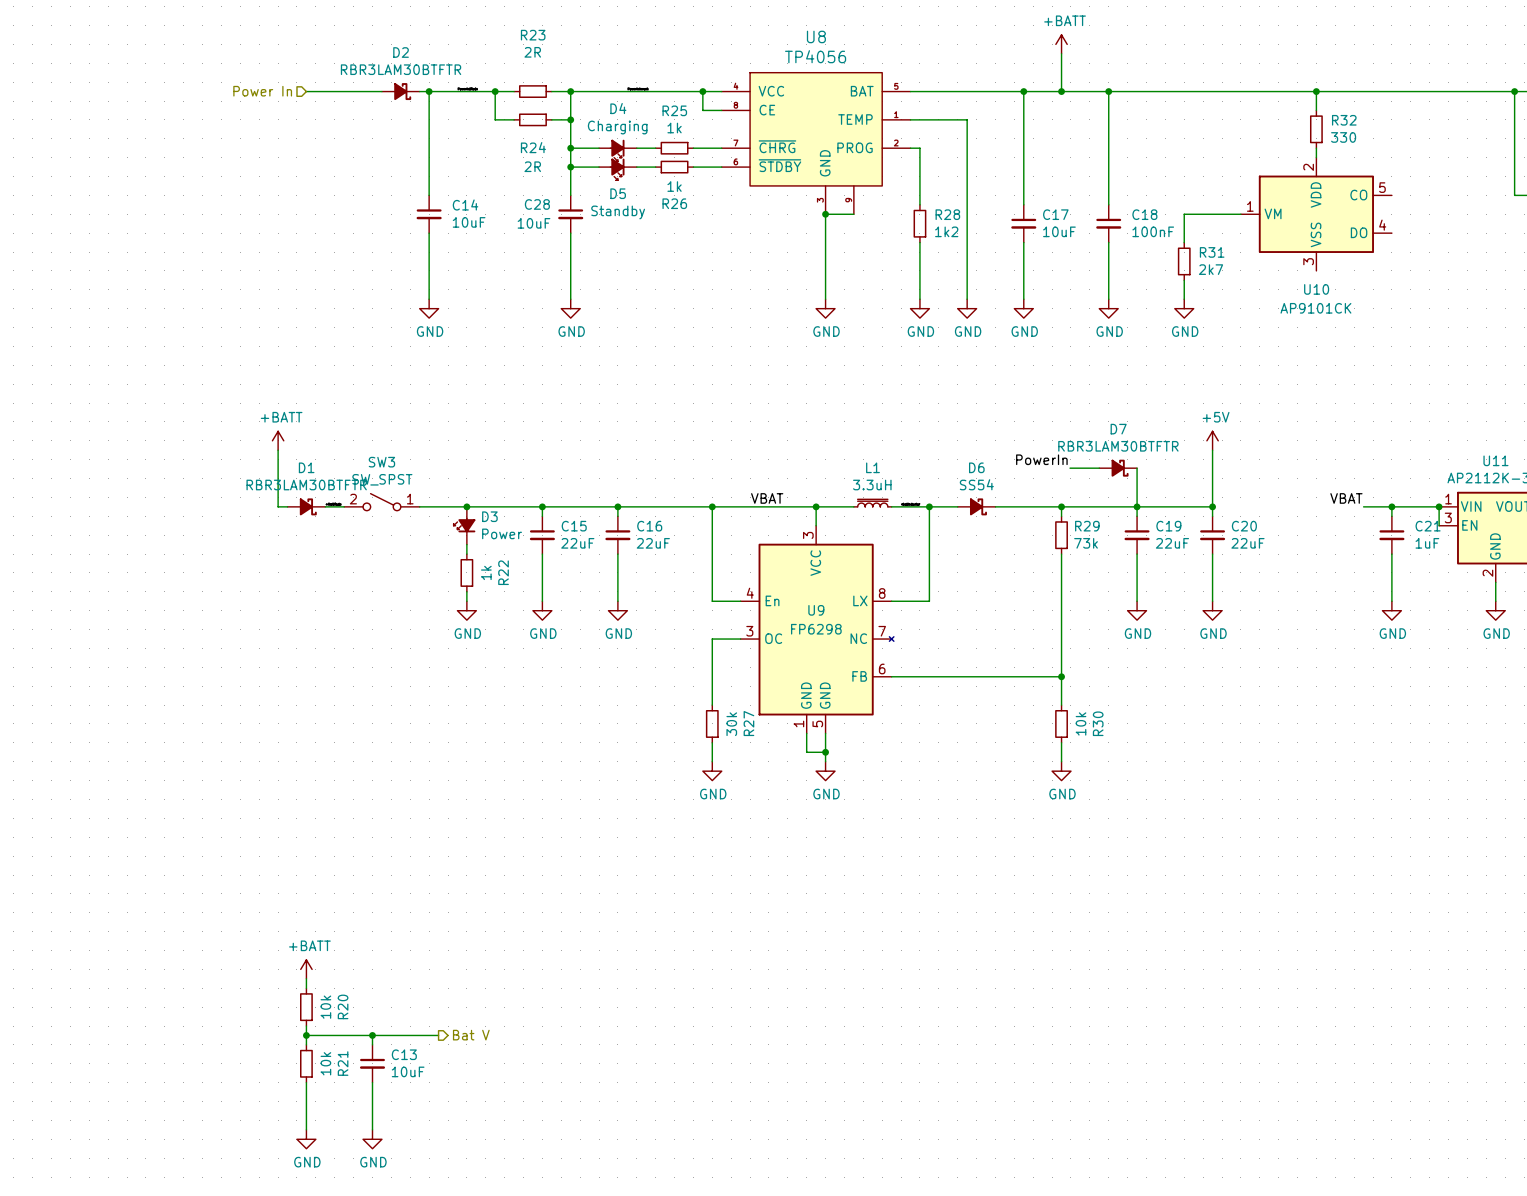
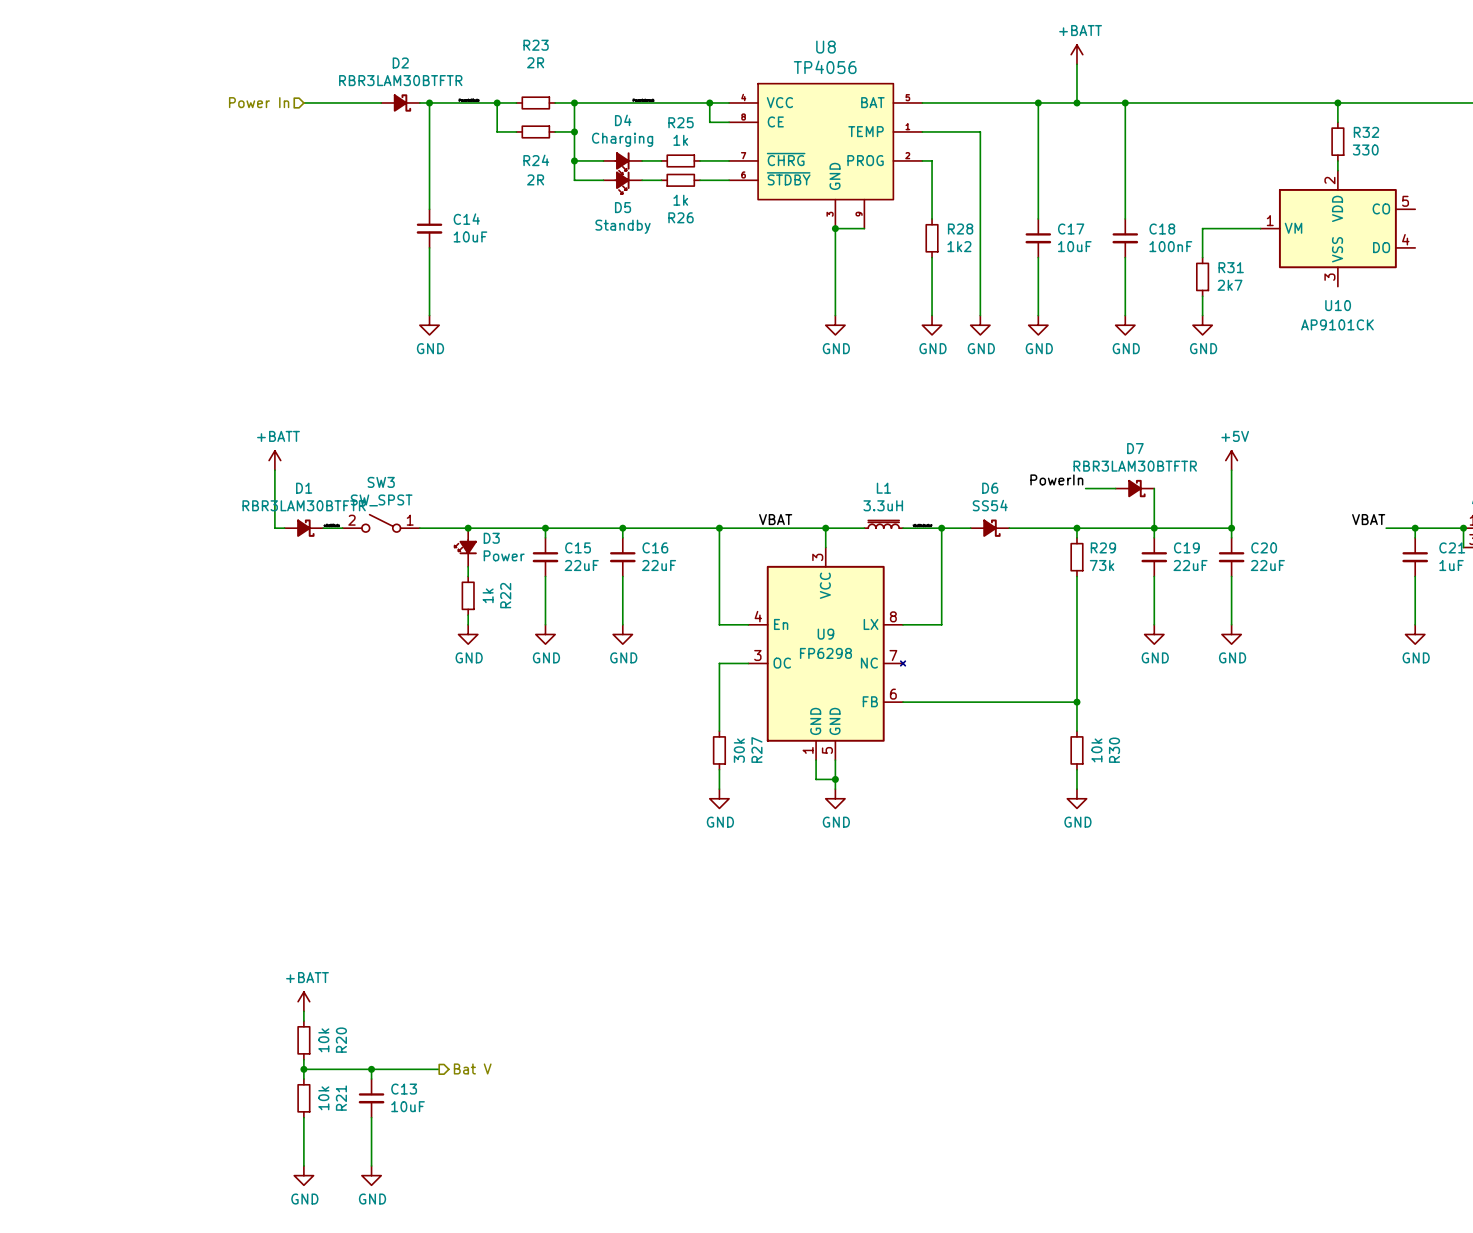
wire: (570, 167) (570, 195) -> none
junction: (570, 167) -> none
C28: 10uF (570, 214) -> none
wire: (570, 233) (570, 299) -> none
power symbol: GND (570, 308) -> none

